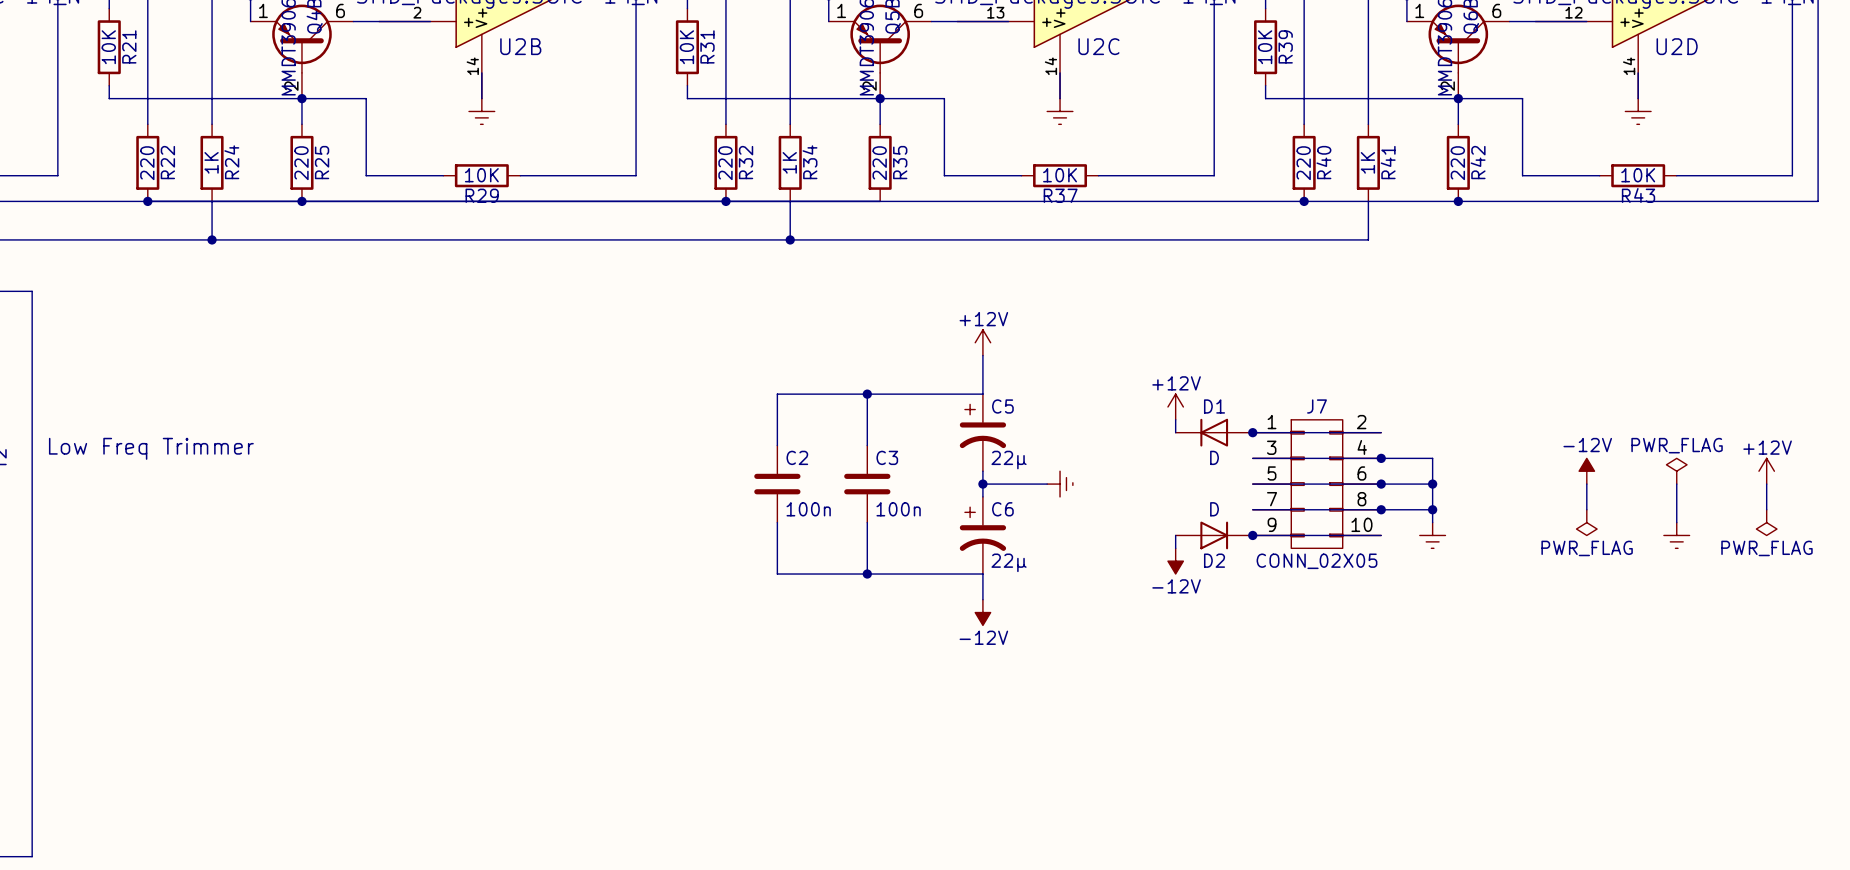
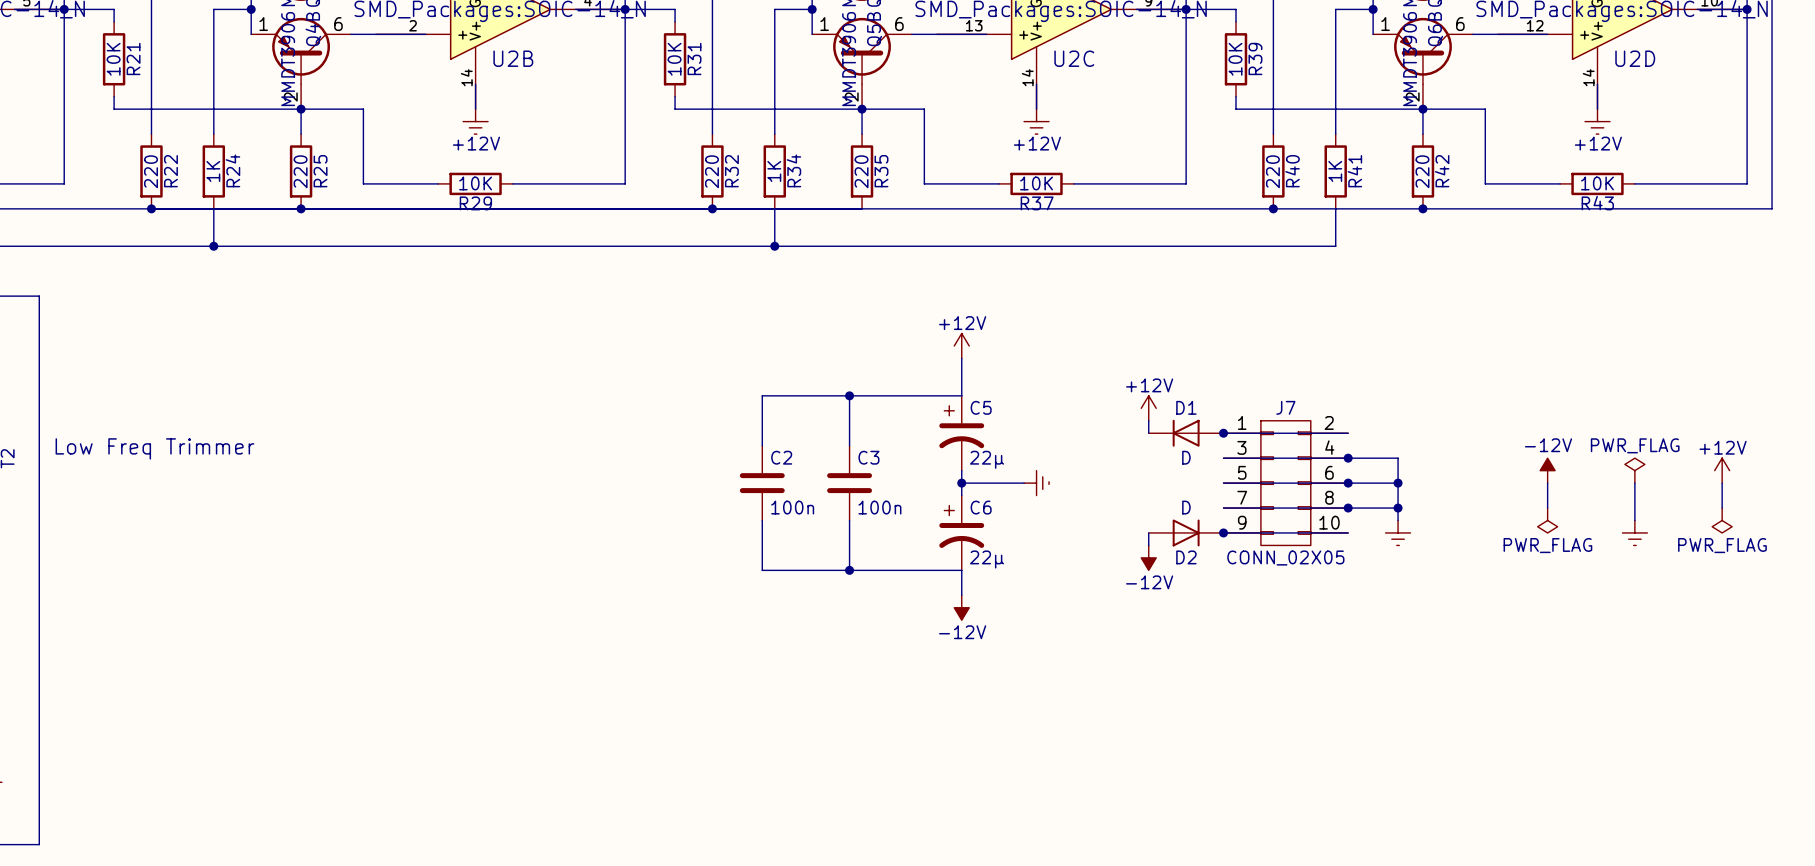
power symbol text: none -> +12V (476, 143)
power symbol text: none -> +12V (1037, 143)
power symbol text: none -> +12V (1598, 143)

